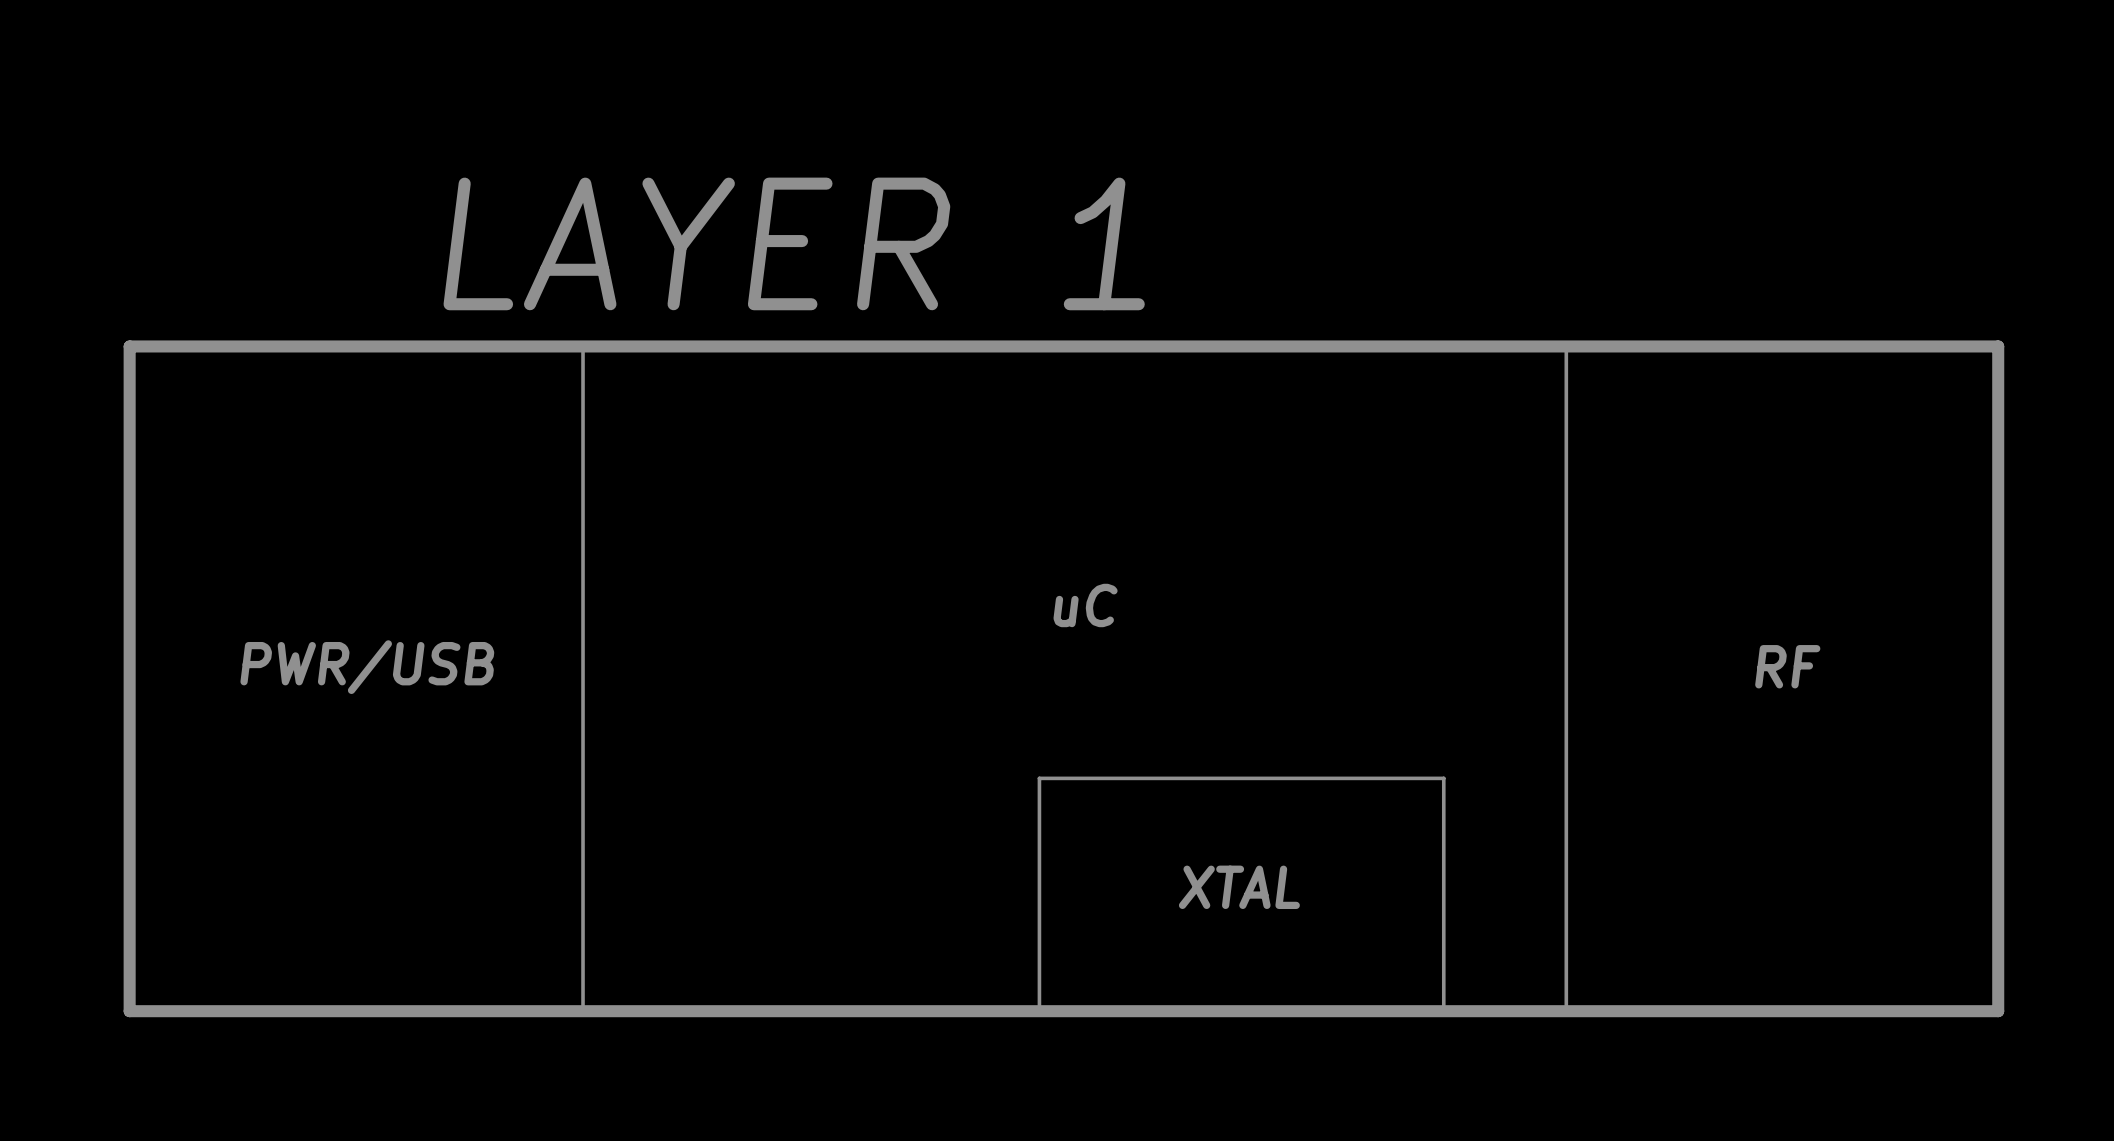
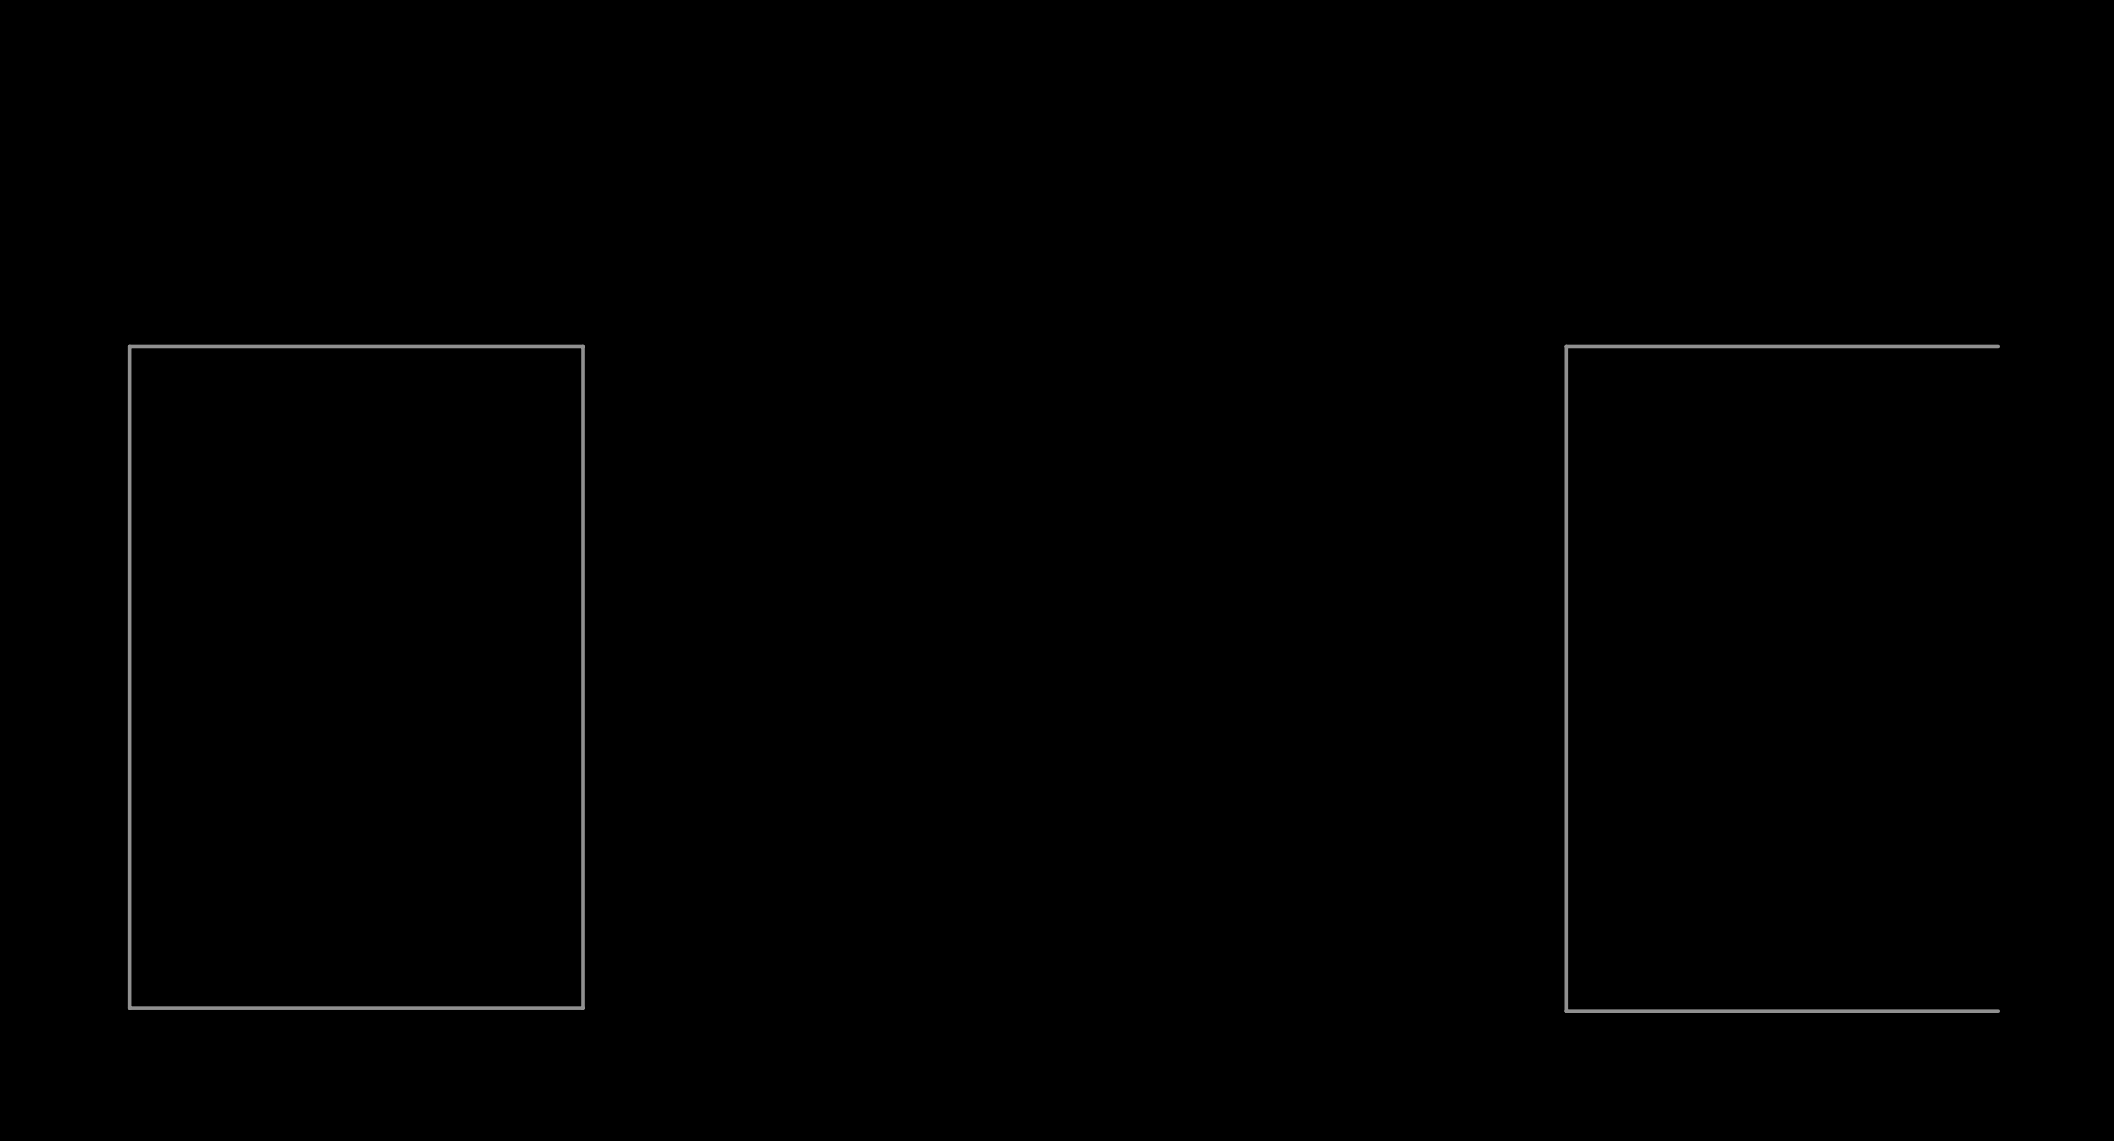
text: LAYER 1 (794, 243) -> none
line: (1998, 346) (129, 346) (129, 1011) (1998, 1011) -> none
line: (1998, 346) (1998, 1011) -> none
text: uC (1085, 605) -> none
text: RF (1787, 666) -> none
text: PWR/USB (367, 667) -> none
line: (1039, 778) (1039, 1011) (1443, 1011) (1443, 778) (1039, 778) -> none
text: XTAL (1239, 887) -> none

